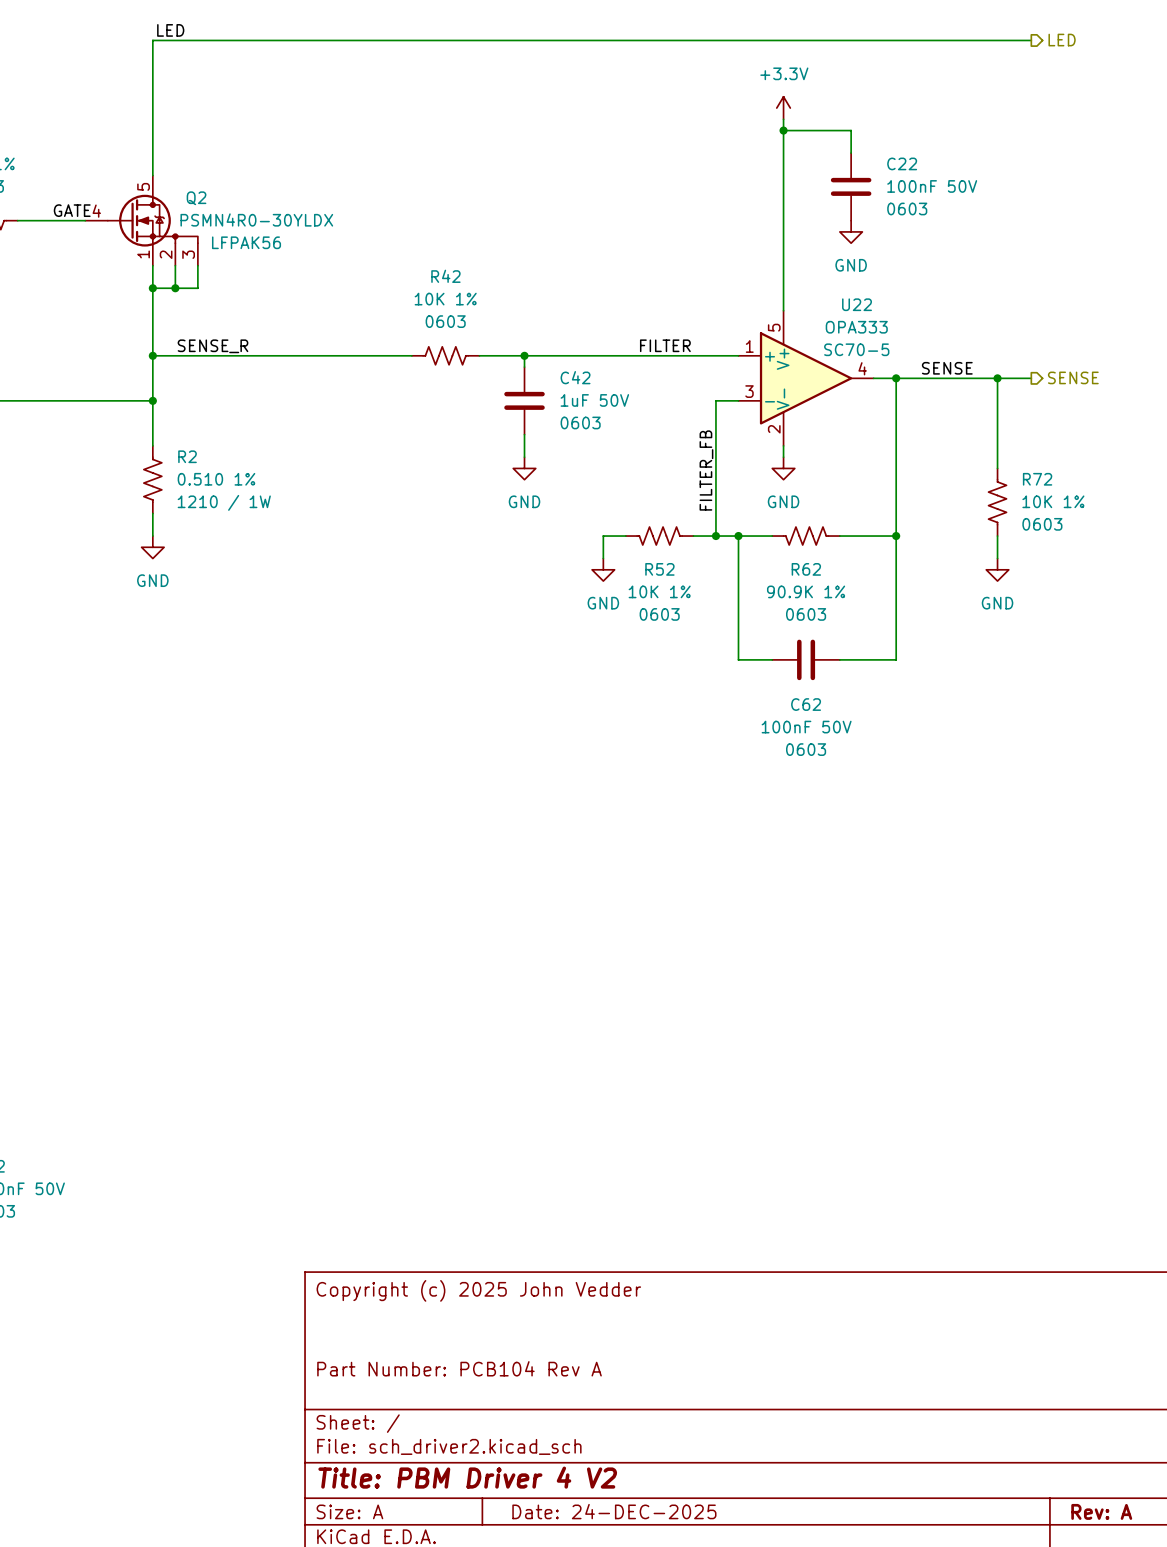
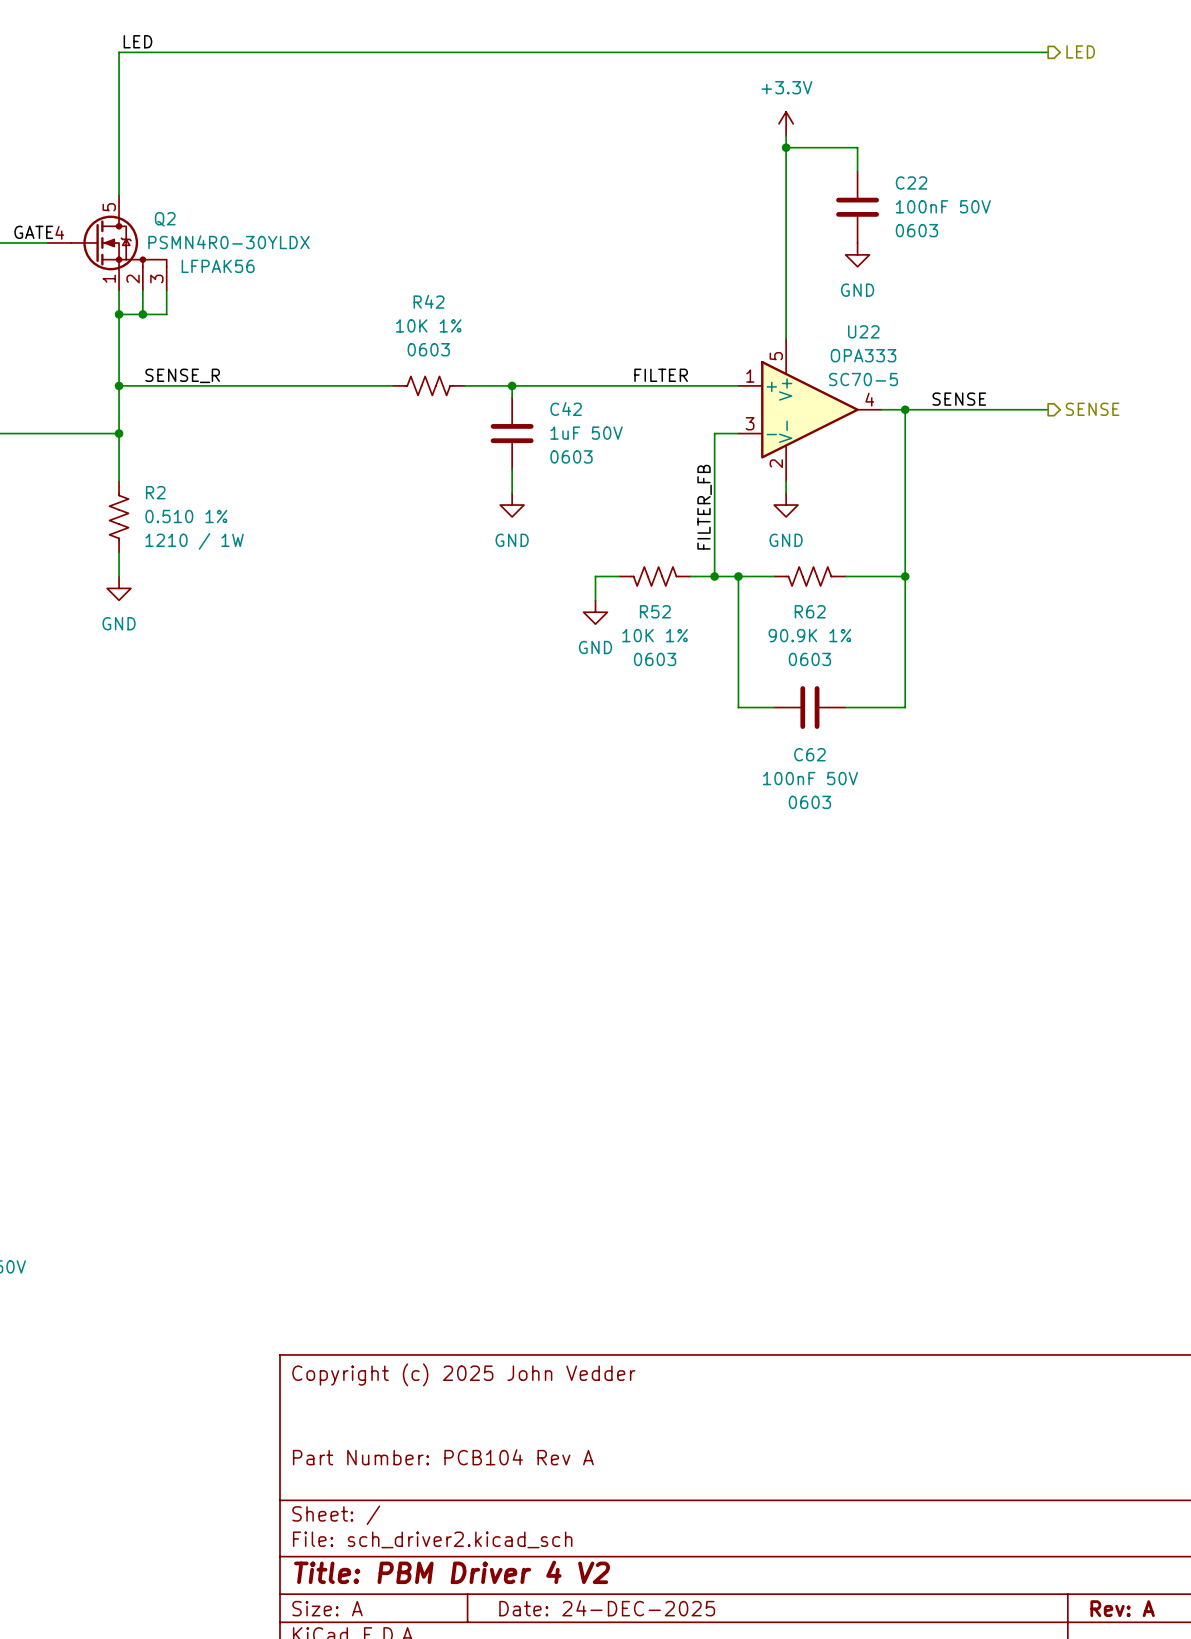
wire: (997, 378) (997, 468) -> none
junction: (997, 378) -> none
R72: 10K 1% (997, 502) -> none
wire: (997, 536) (997, 558) -> none
power symbol: GND (997, 569) -> none

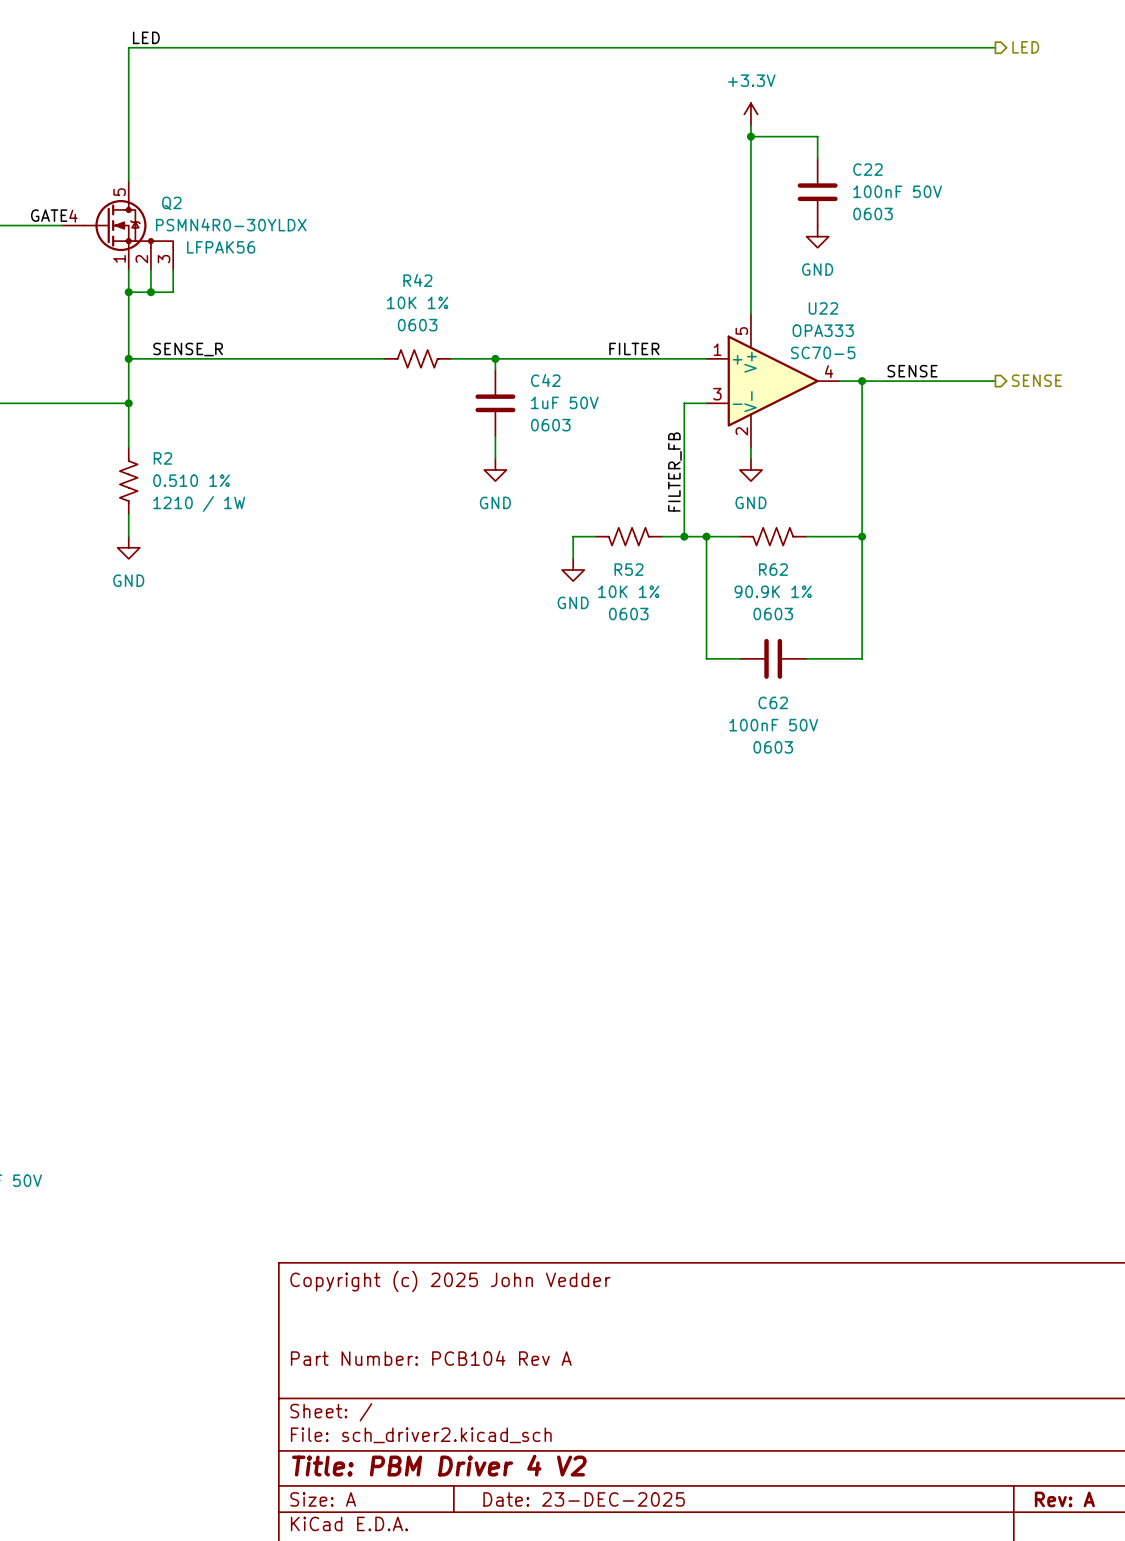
title block: Date: 24-DEC-2025 (607, 1608) -> Date: 23-DEC-2025 (584, 1499)

